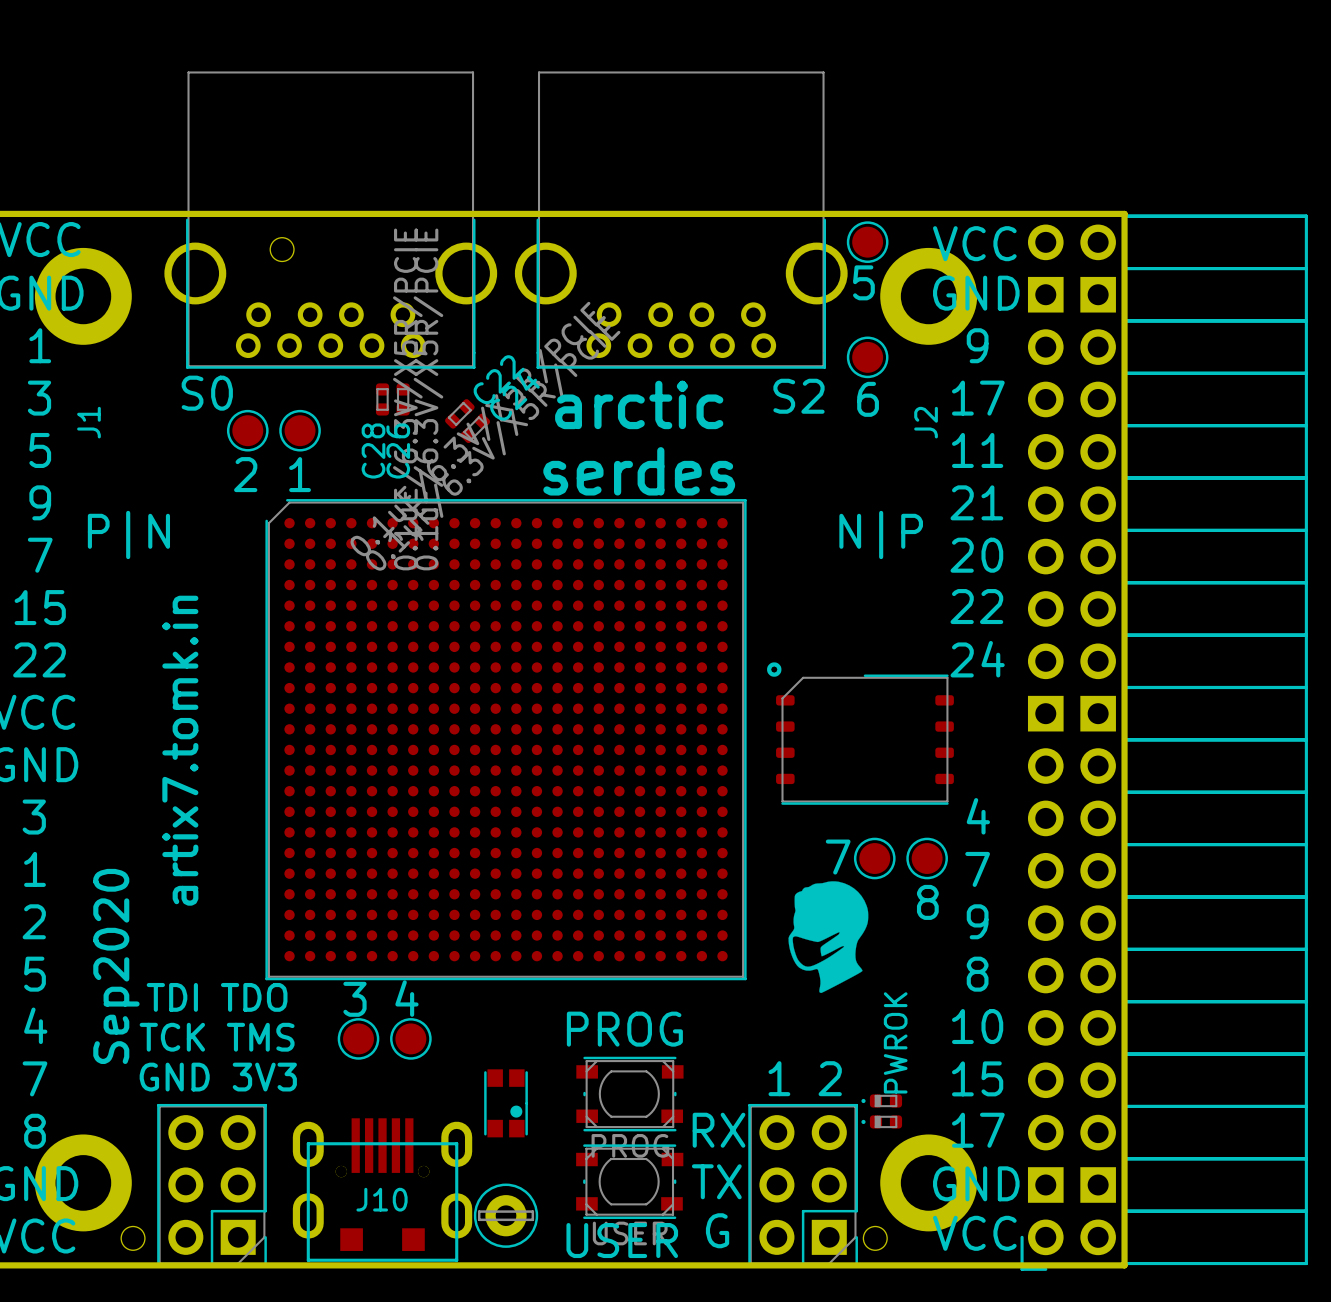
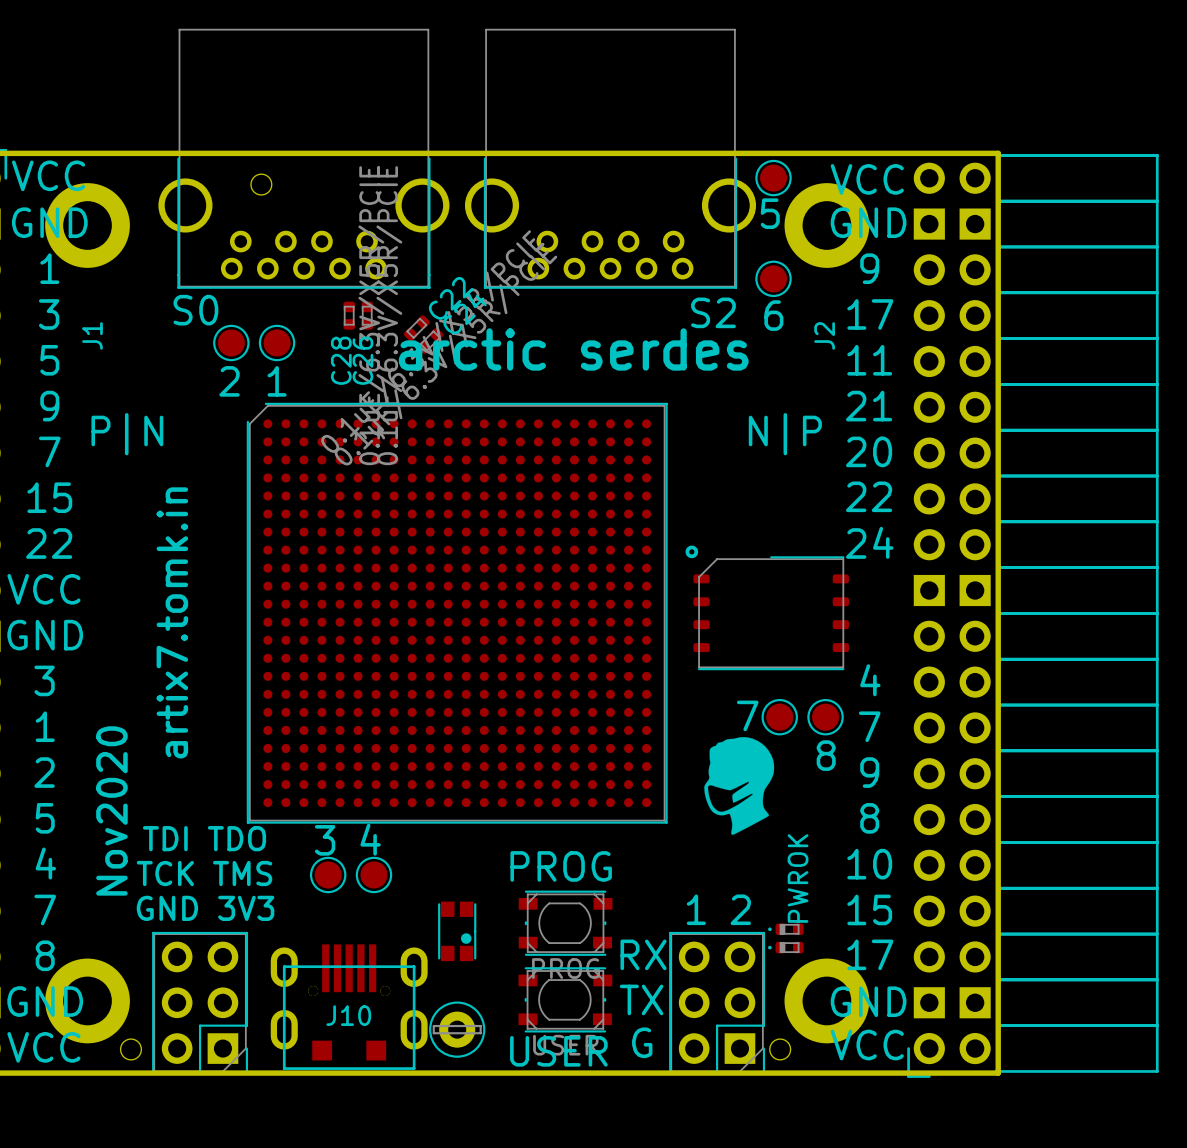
text: arctic (639, 404) -> none
text: none -> arctic serdes (573, 349)
text: serdes (639, 471) -> none
text: Sep2020 (116, 966) -> Nov2020 (111, 810)

